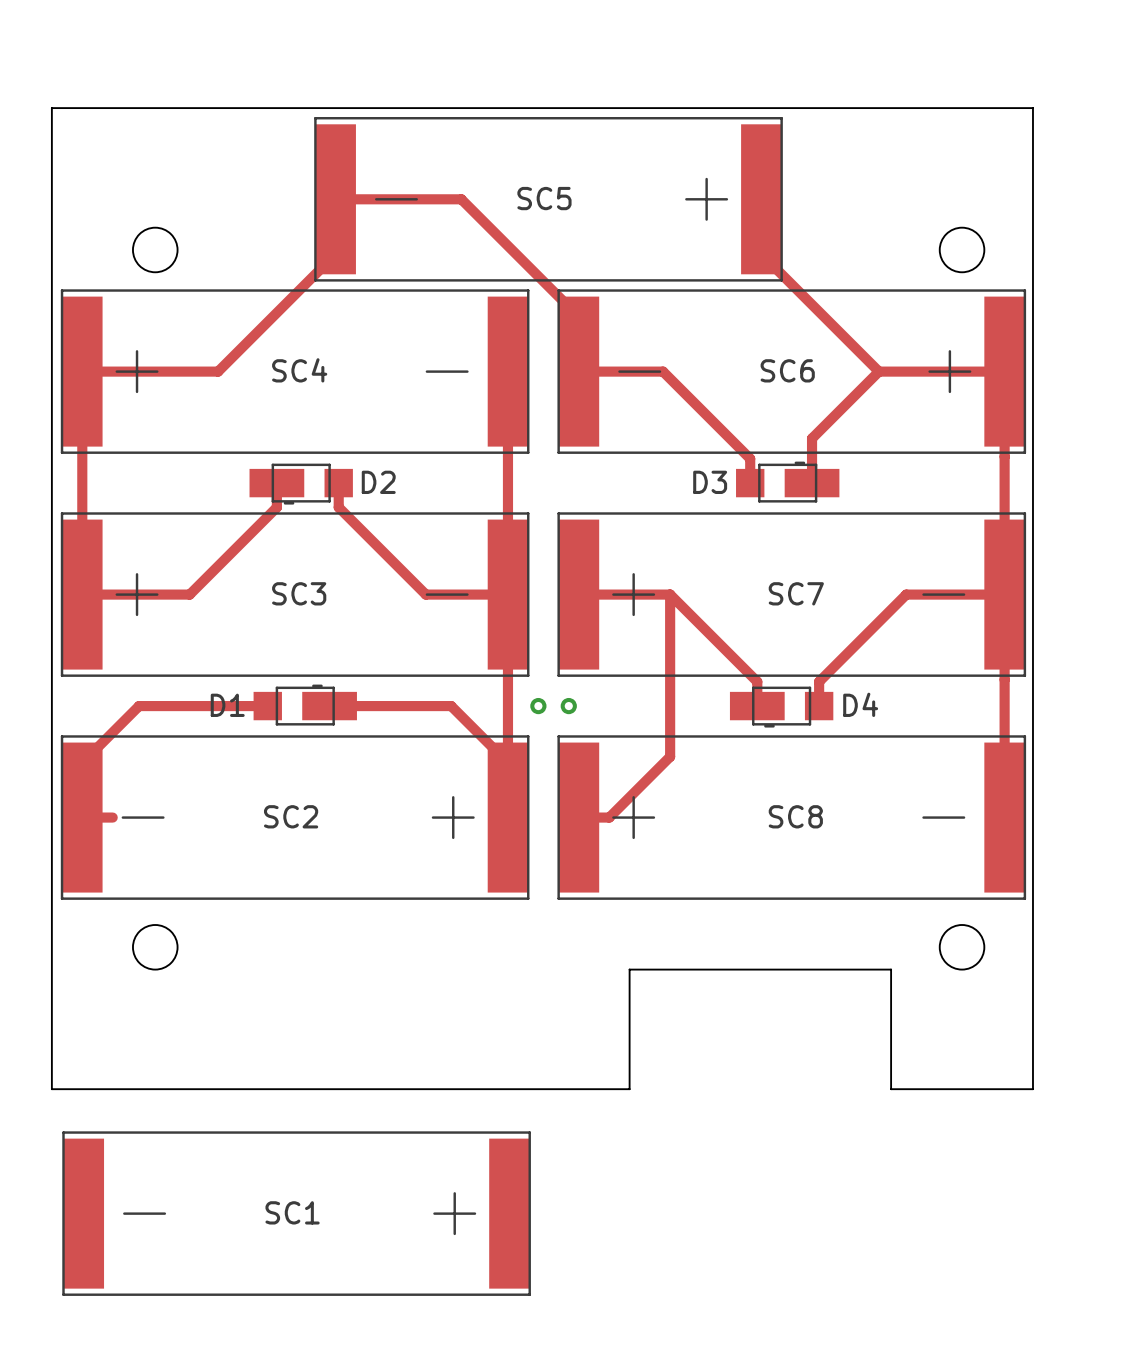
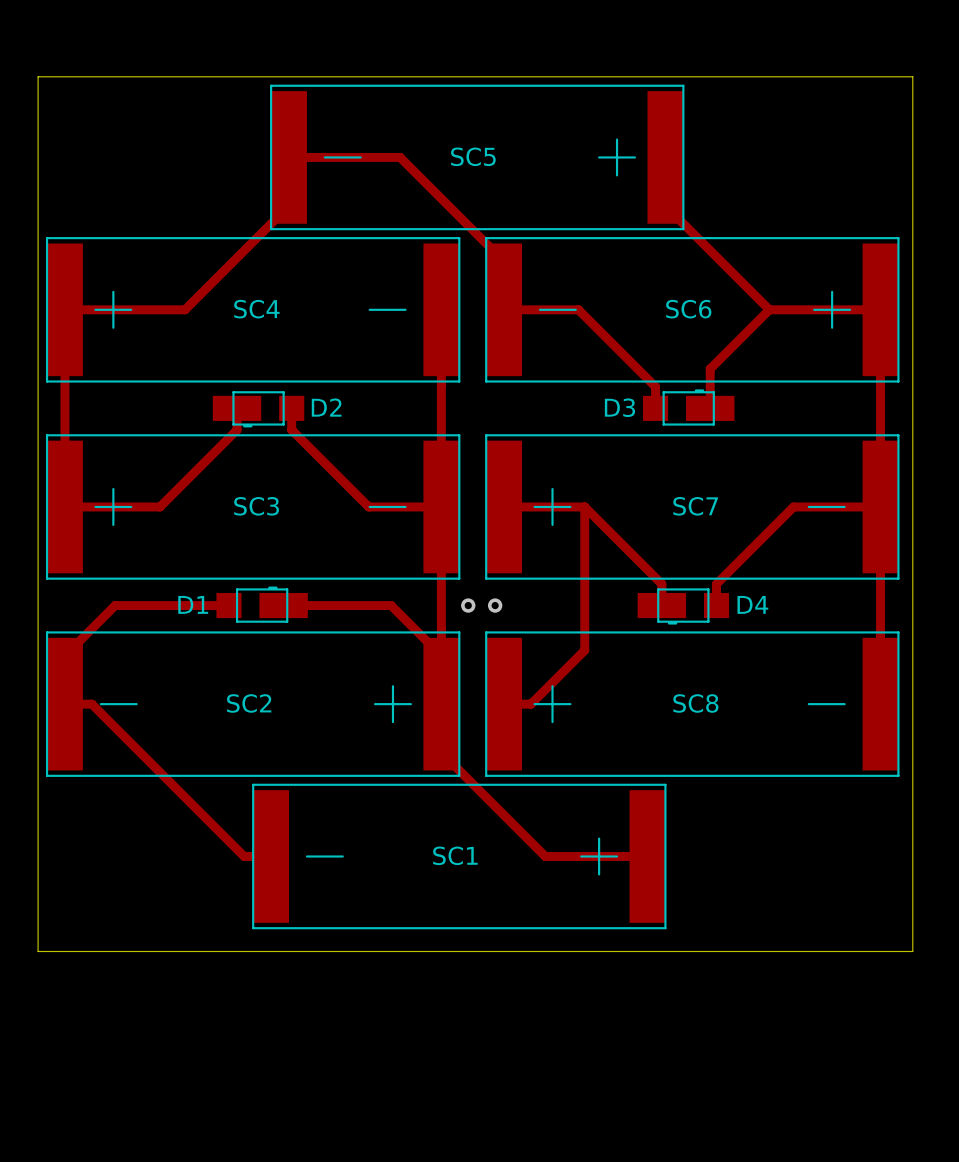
board edge: (1032, 108) (1032, 1089) (891, 1089) (891, 969) (629, 969) (629, 1089) (51, 1089) -> (905, 76) (912, 76) (912, 951) (38, 951) (38, 944)
round board edge: [132, 227, 179, 273] -> none
round board edge: [939, 227, 985, 273] -> none
track: none -> (91, 704) (244, 856) (271, 856)
track: none -> (441, 752) (545, 856) (647, 856)
round board edge: [132, 924, 179, 971] -> none
round board edge: [939, 924, 985, 971] -> none
SC1 position: (296, 1213) -> (459, 856)

